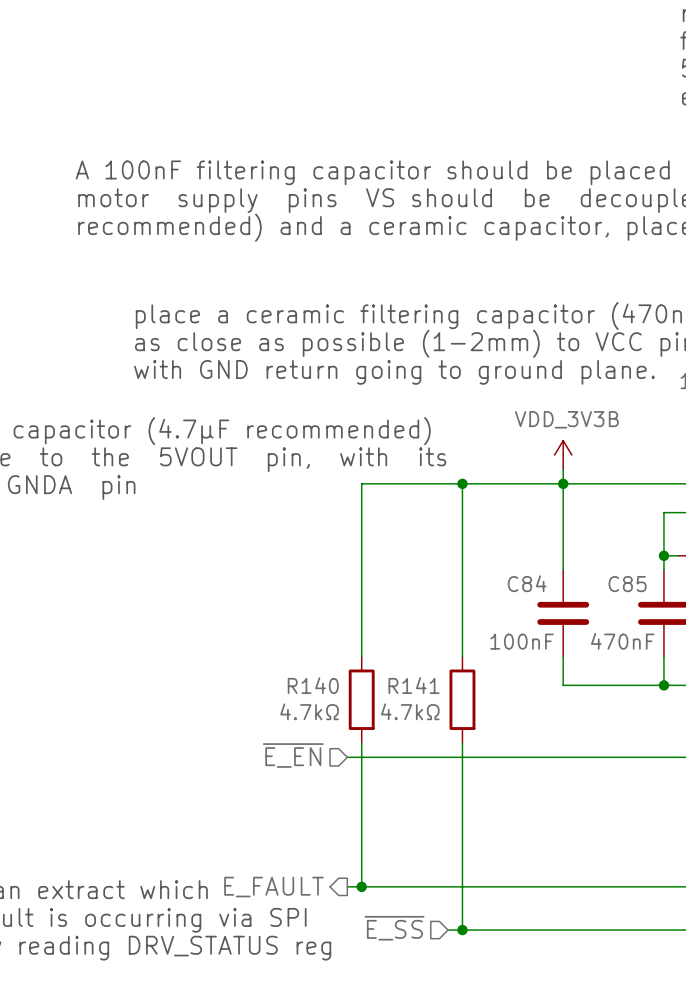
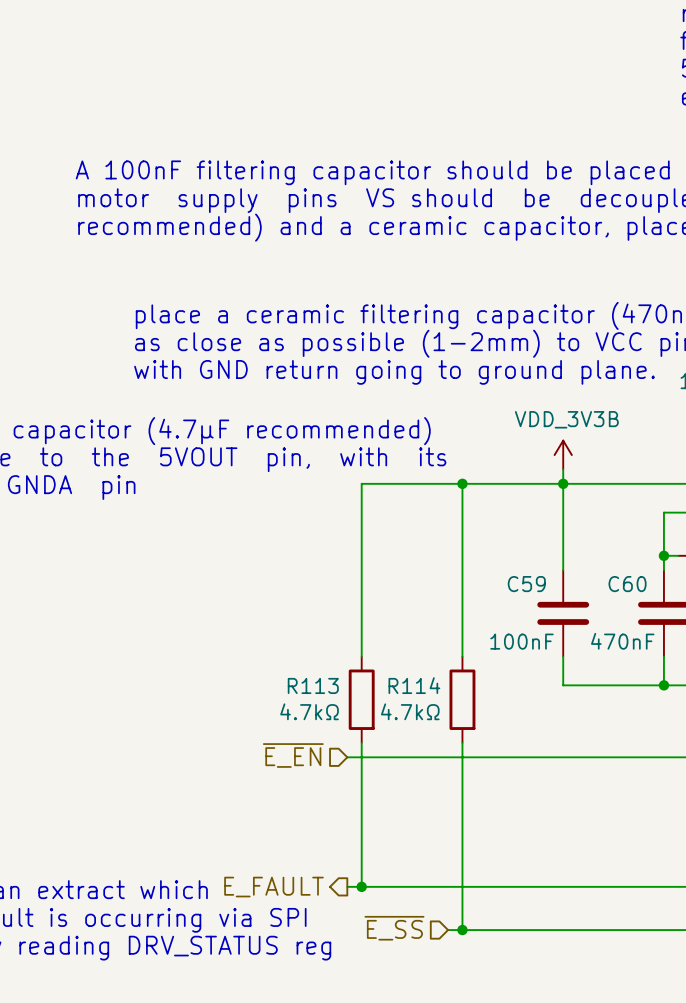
C84 name: C84 (527, 583) -> C59 (526, 584)
C85 name: C85 (627, 584) -> C60 (627, 584)
R140 name: R140 (313, 685) -> R113 (313, 685)
R141 name: R141 (414, 685) -> R114 (414, 685)

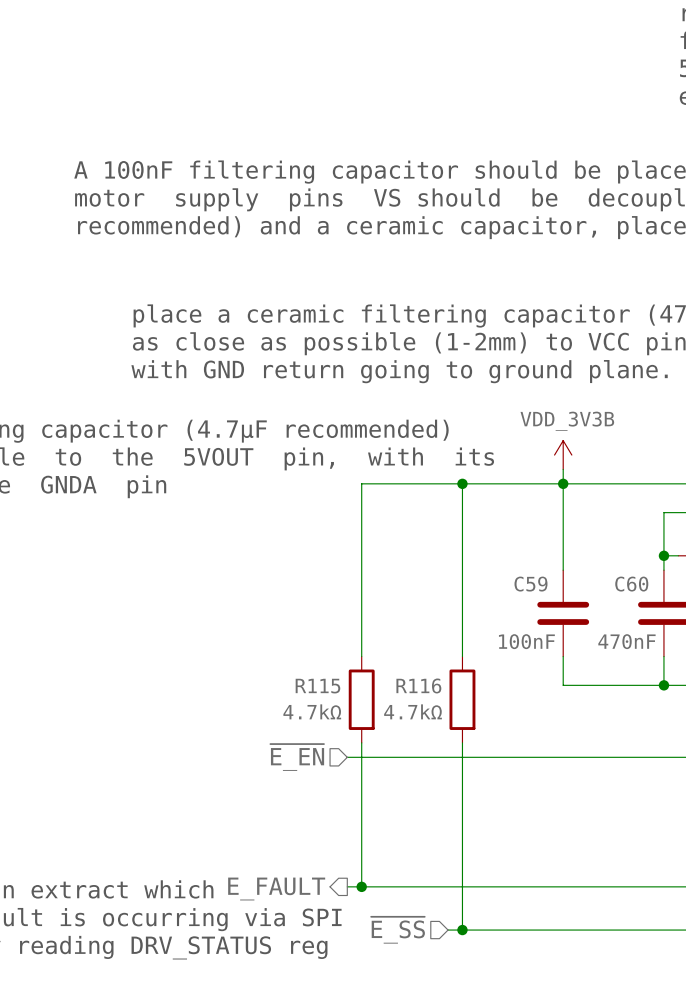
R113 name: R113 (313, 685) -> R115 (317, 686)
R114 name: R114 (414, 685) -> R116 (418, 685)

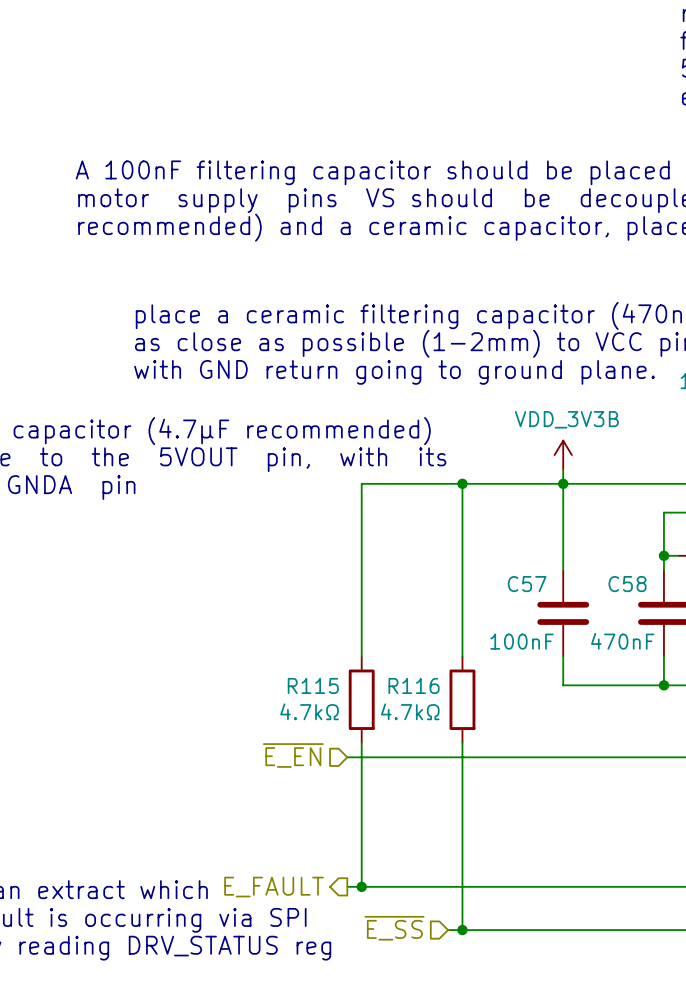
C59 name: C59 (530, 584) -> C57 (527, 584)
C60 name: C60 (631, 584) -> C58 (627, 584)

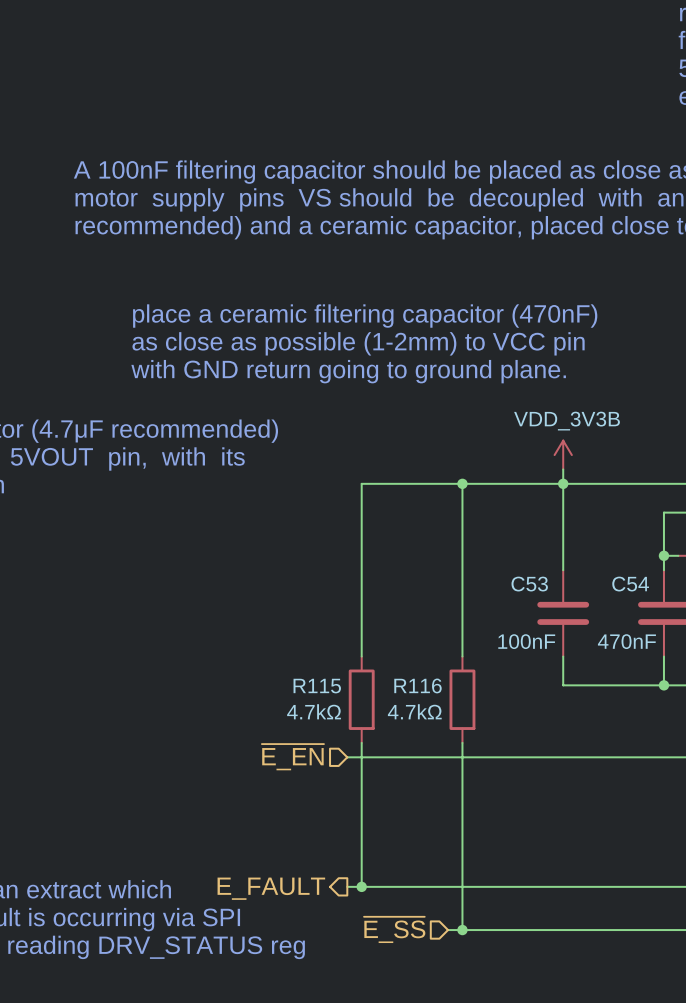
C57 name: C57 (527, 584) -> C53 (529, 584)
C58 name: C58 (627, 584) -> C54 (630, 584)

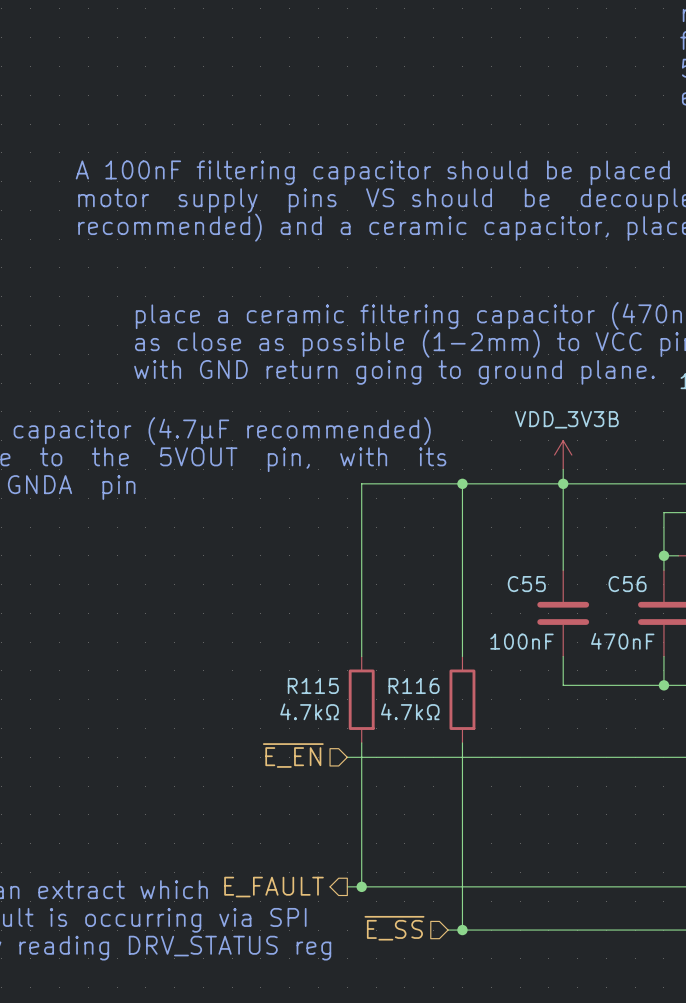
C53 name: C53 (529, 584) -> C55 (526, 584)
C54 name: C54 (630, 584) -> C56 (627, 584)

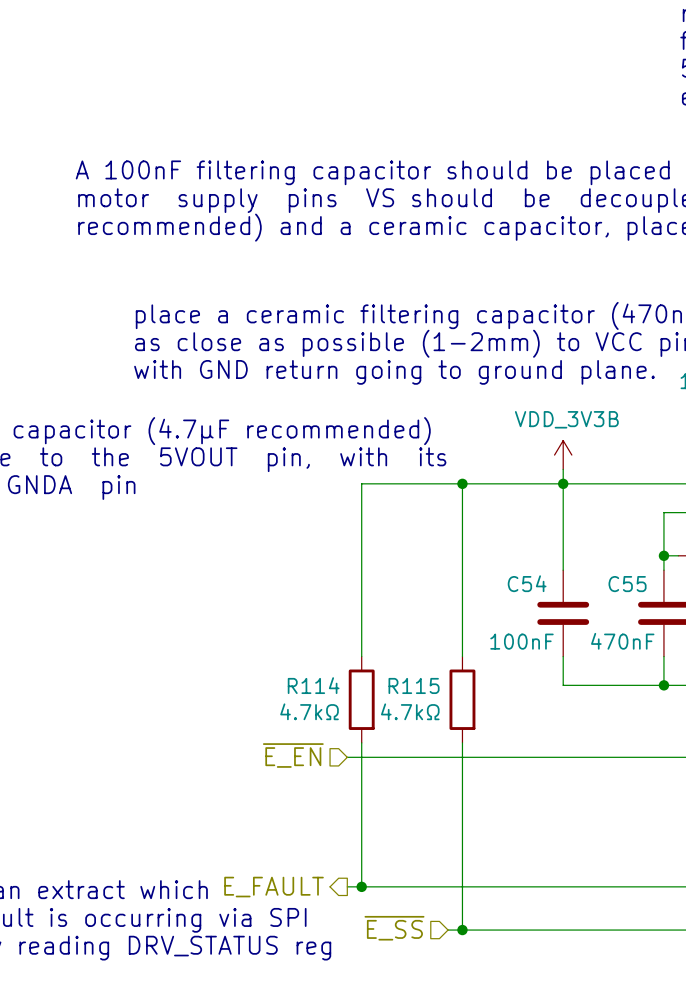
C55 name: C55 (526, 584) -> C54 (527, 583)
C56 name: C56 (627, 584) -> C55 (627, 584)
R115 name: R115 (313, 685) -> R114 (313, 685)
R116 name: R116 (414, 685) -> R115 (414, 685)

